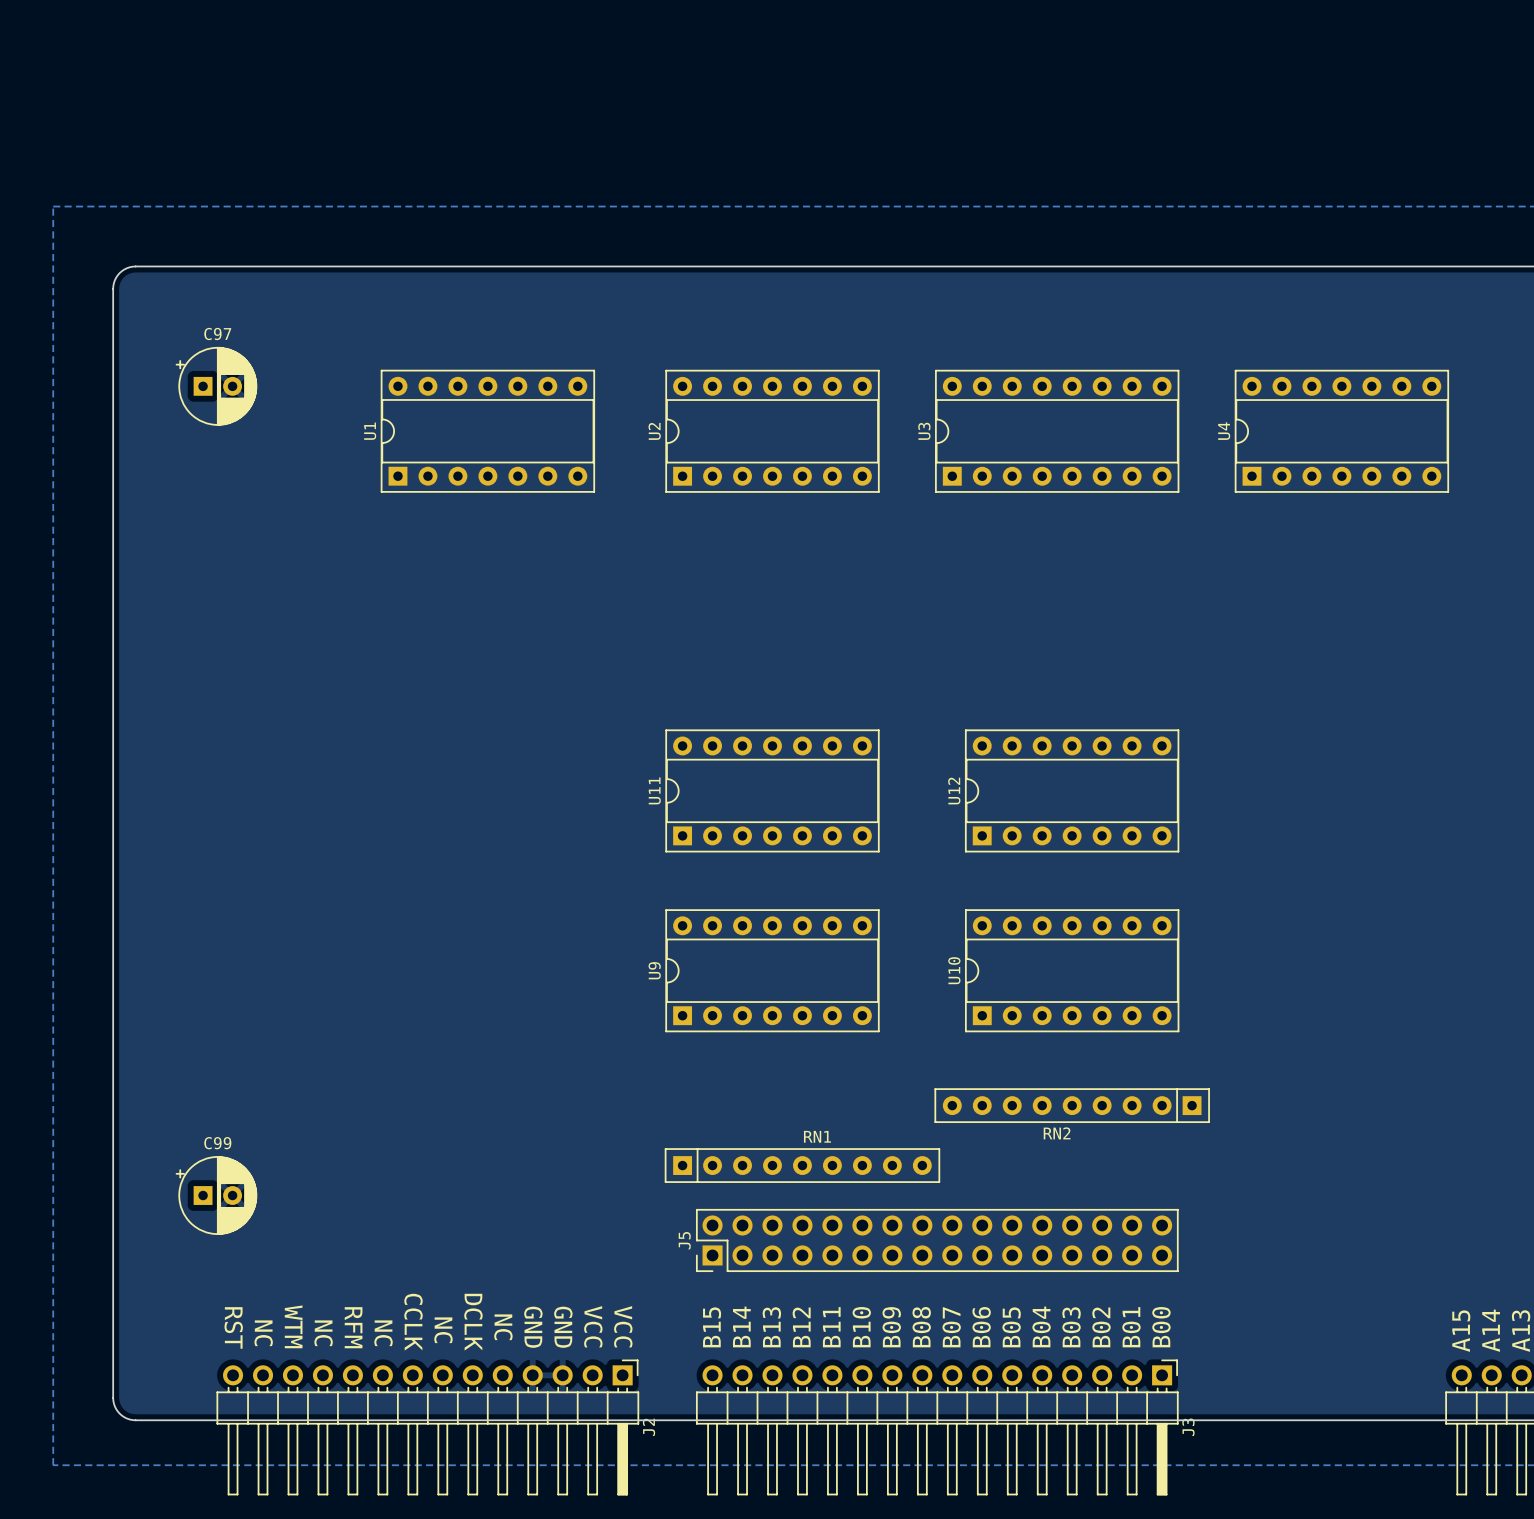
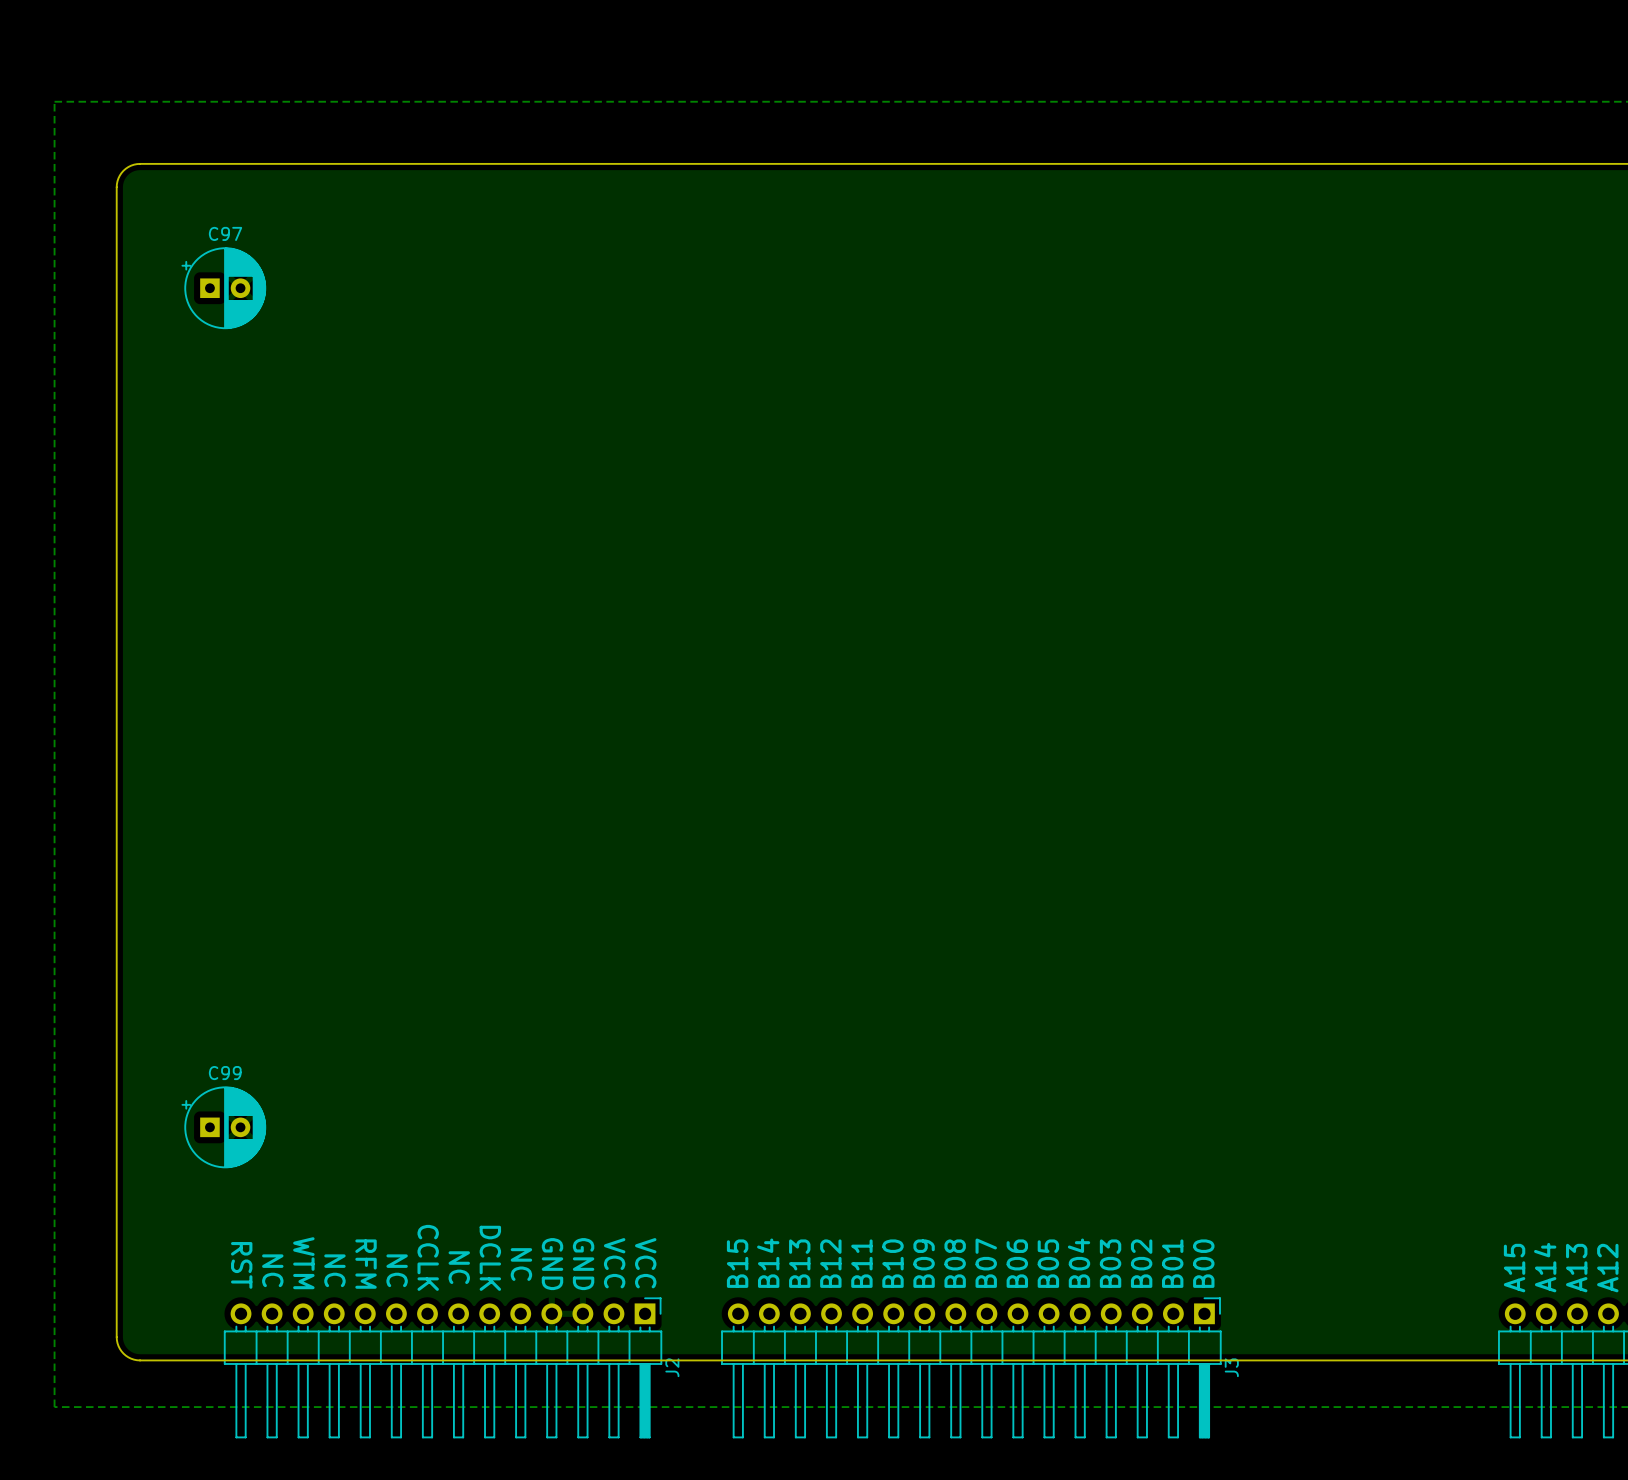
U1: (487, 431) -> none
U2: (772, 431) -> none
U3: (1057, 431) -> none
U4: (1341, 431) -> none
U11: (772, 790) -> none
U12: (1072, 790) -> none
U9: (772, 970) -> none
U10: (1072, 970) -> none
RN2: (1072, 1105) -> none
RN1: (802, 1165) -> none
J5: (937, 1240) -> none

